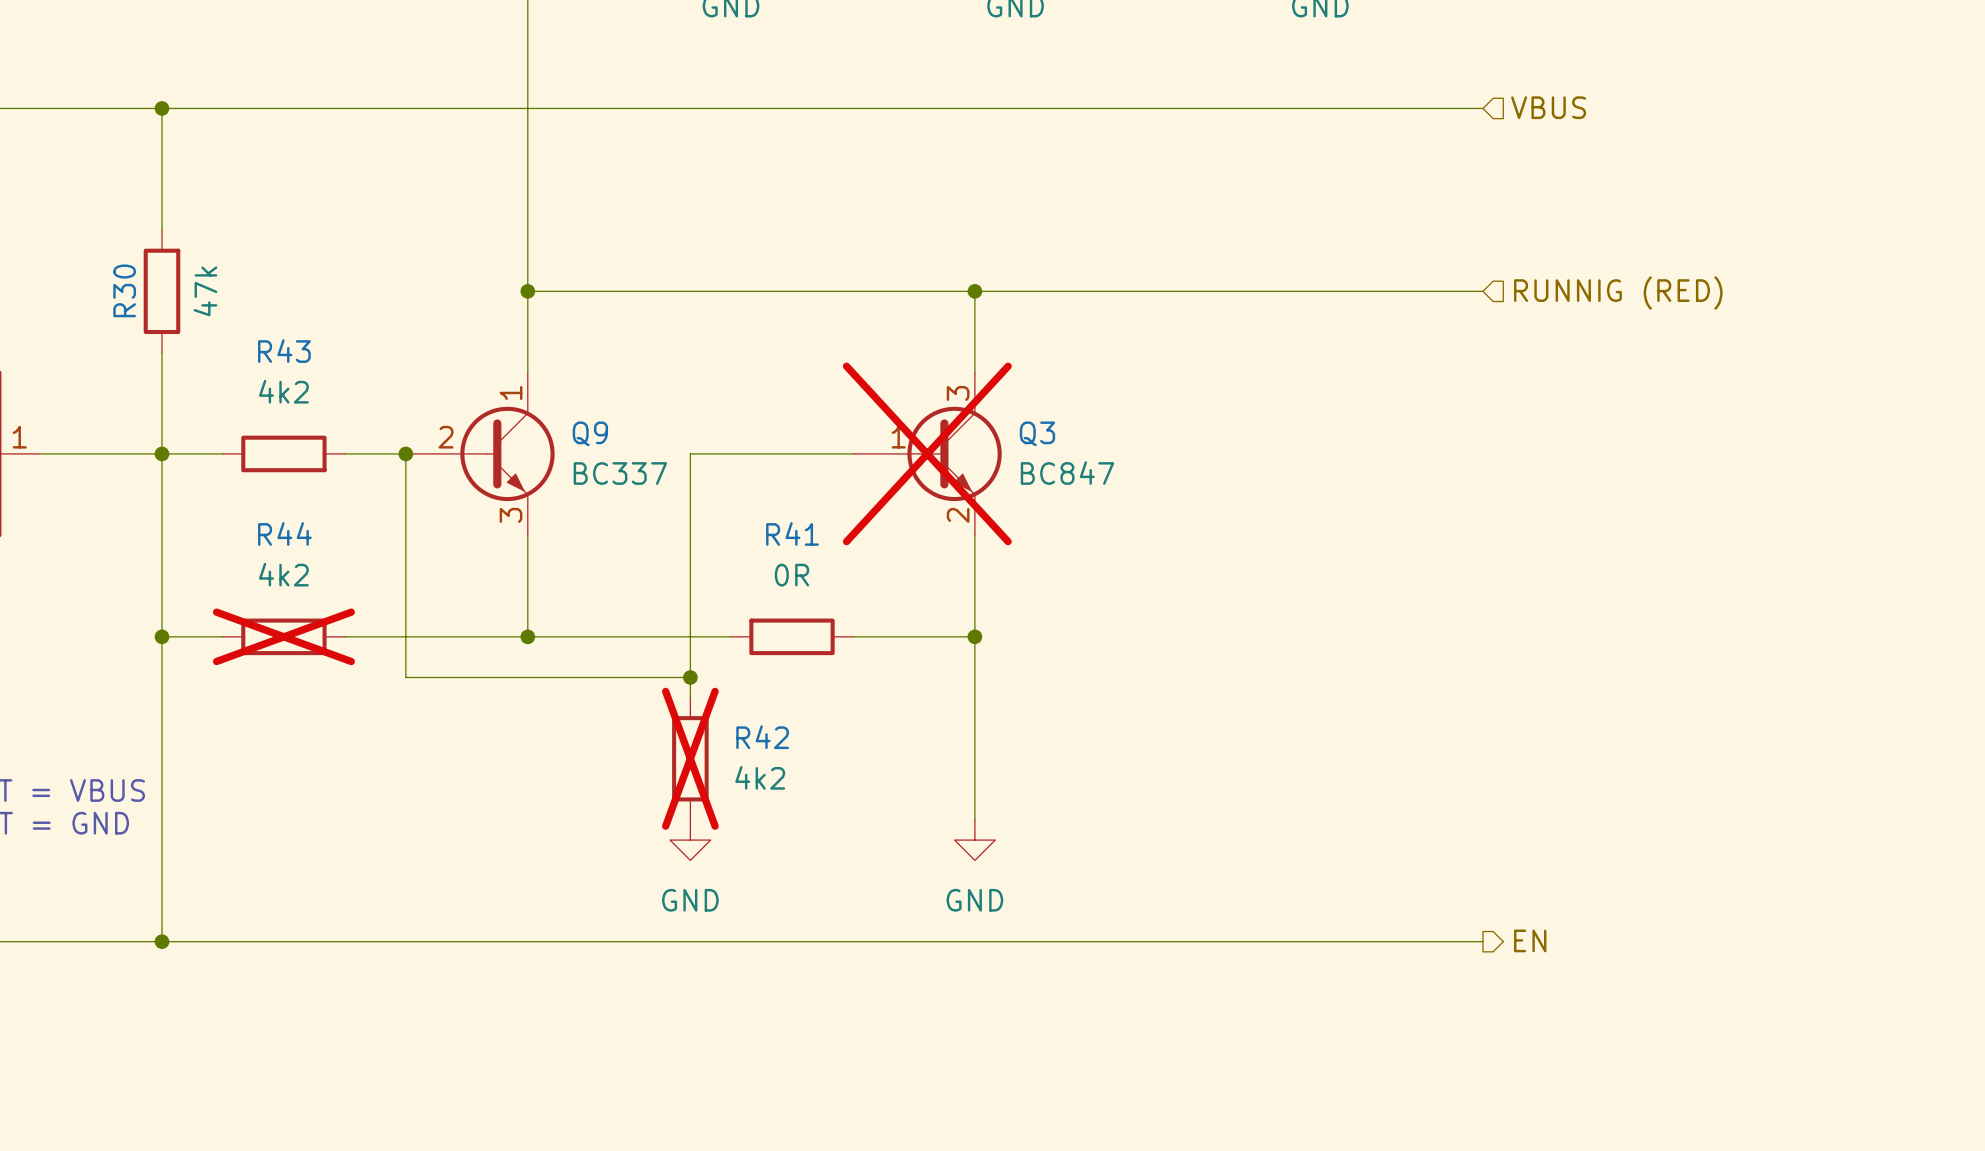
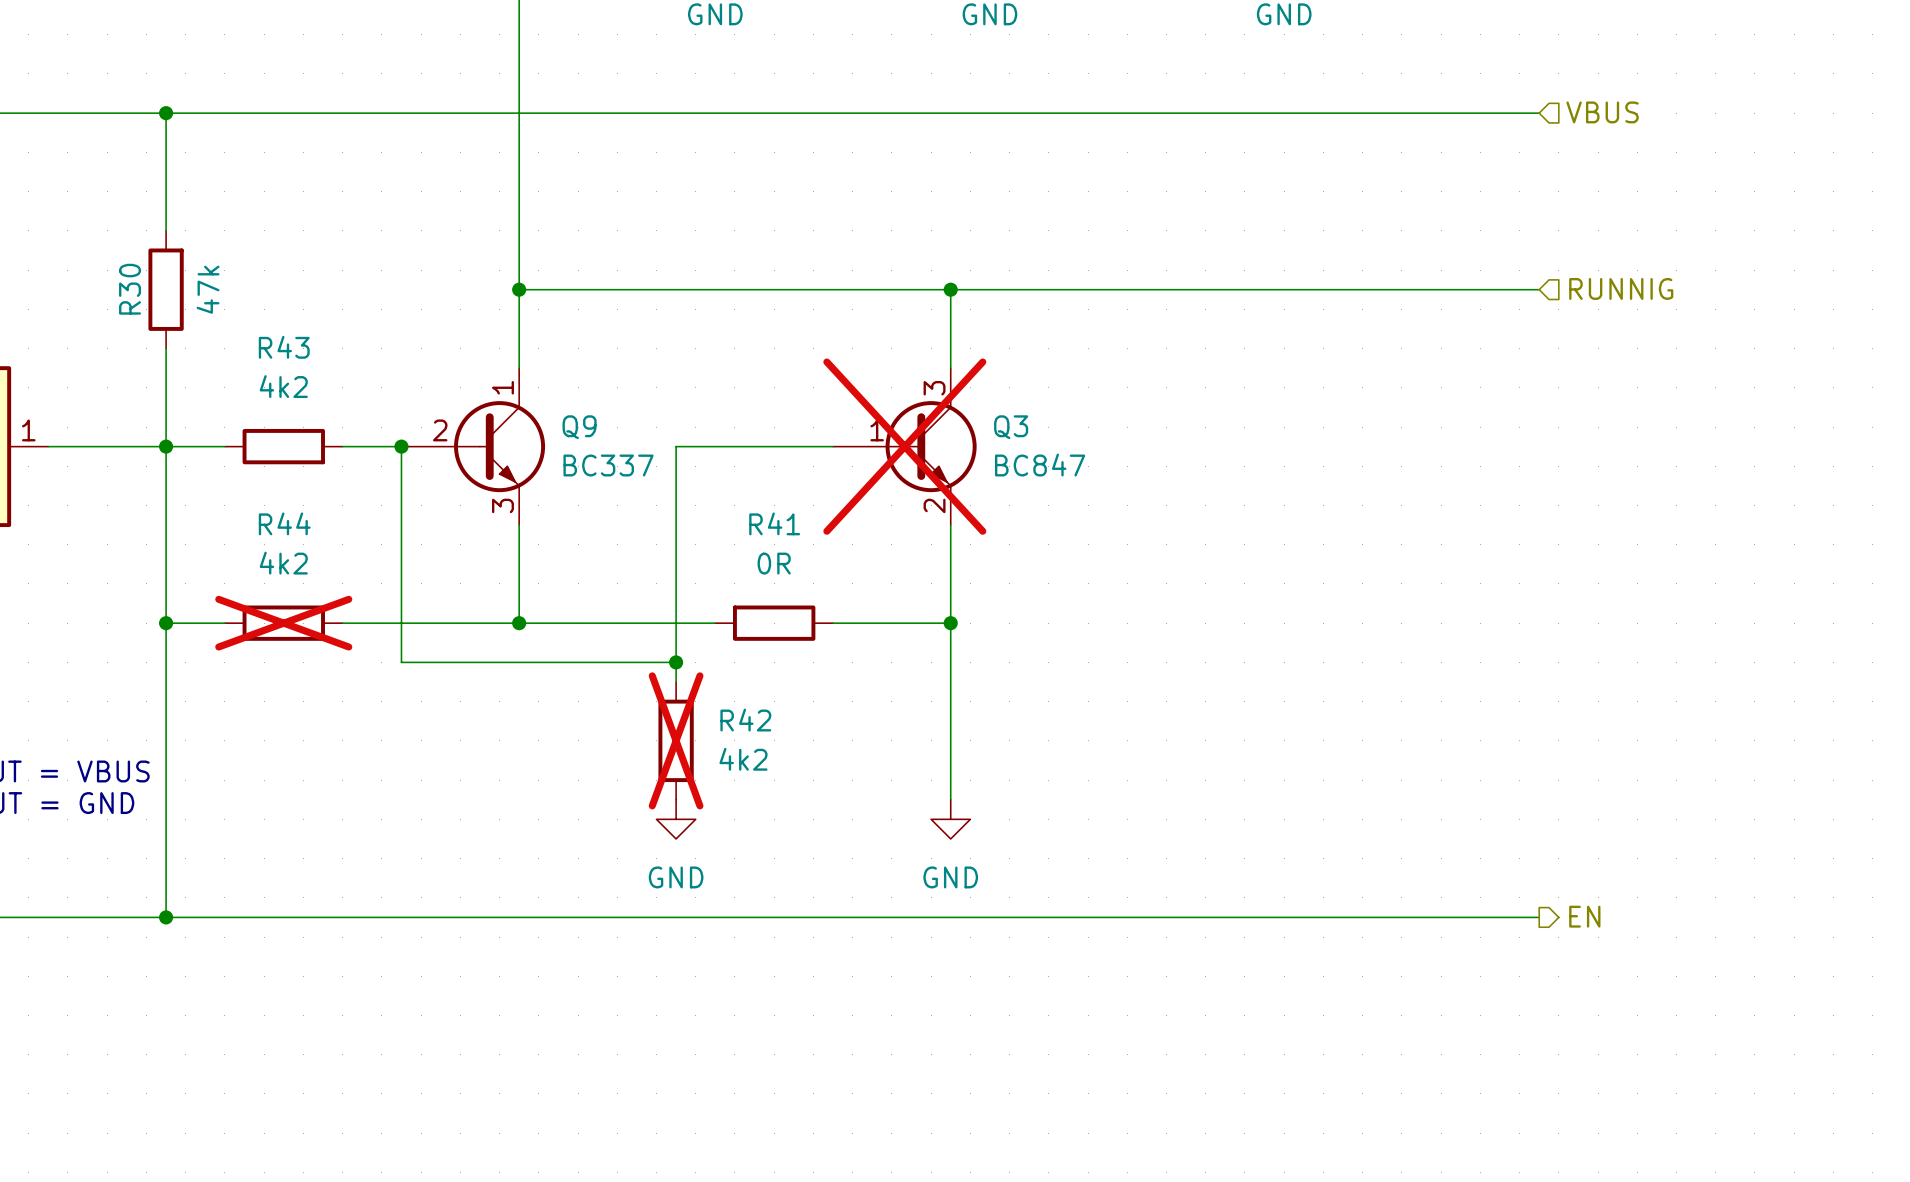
hierarchical label position: VBUS (1548, 107) -> VBUS (1602, 112)
wire: none -> (1441, 113) (1539, 113)
wire: none -> (1441, 289) (1539, 289)
hierarchical label: RUNNIG (RED) (1618, 293) -> RUNNIG (1621, 288)
hierarchical label position: EN (1530, 940) -> EN (1584, 916)
wire: none -> (1441, 917) (1539, 917)

